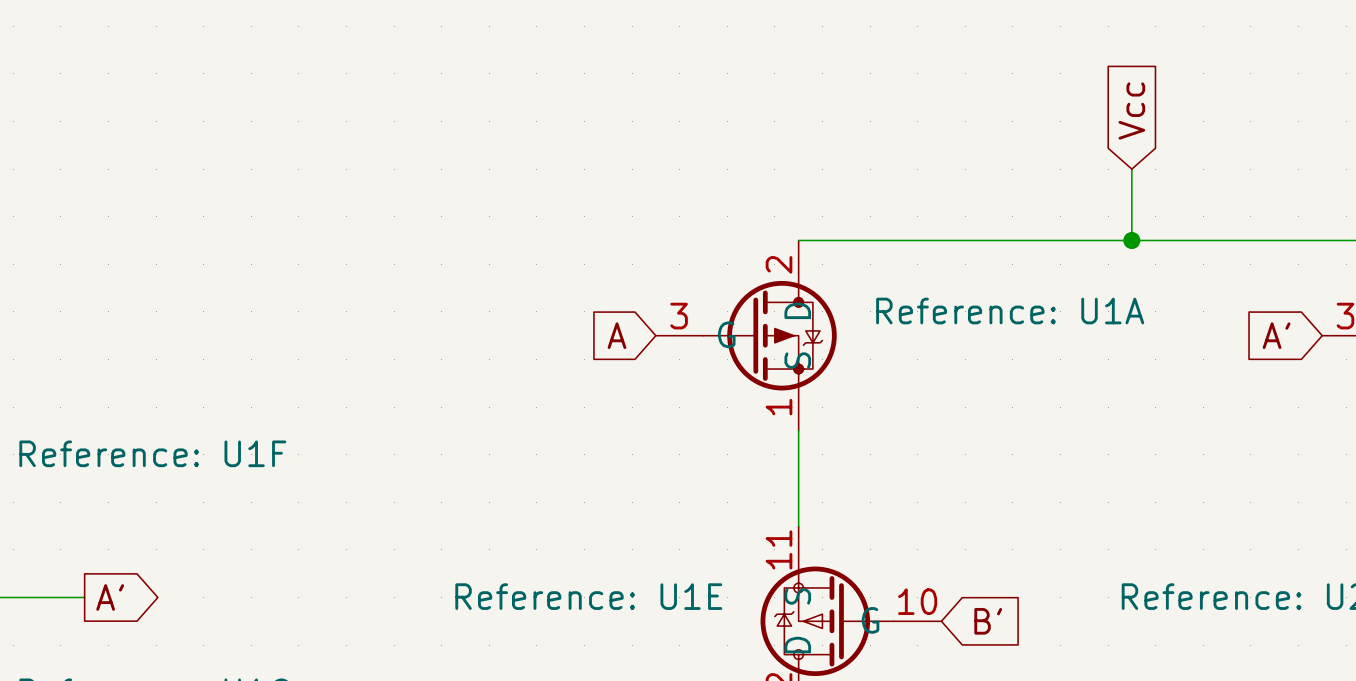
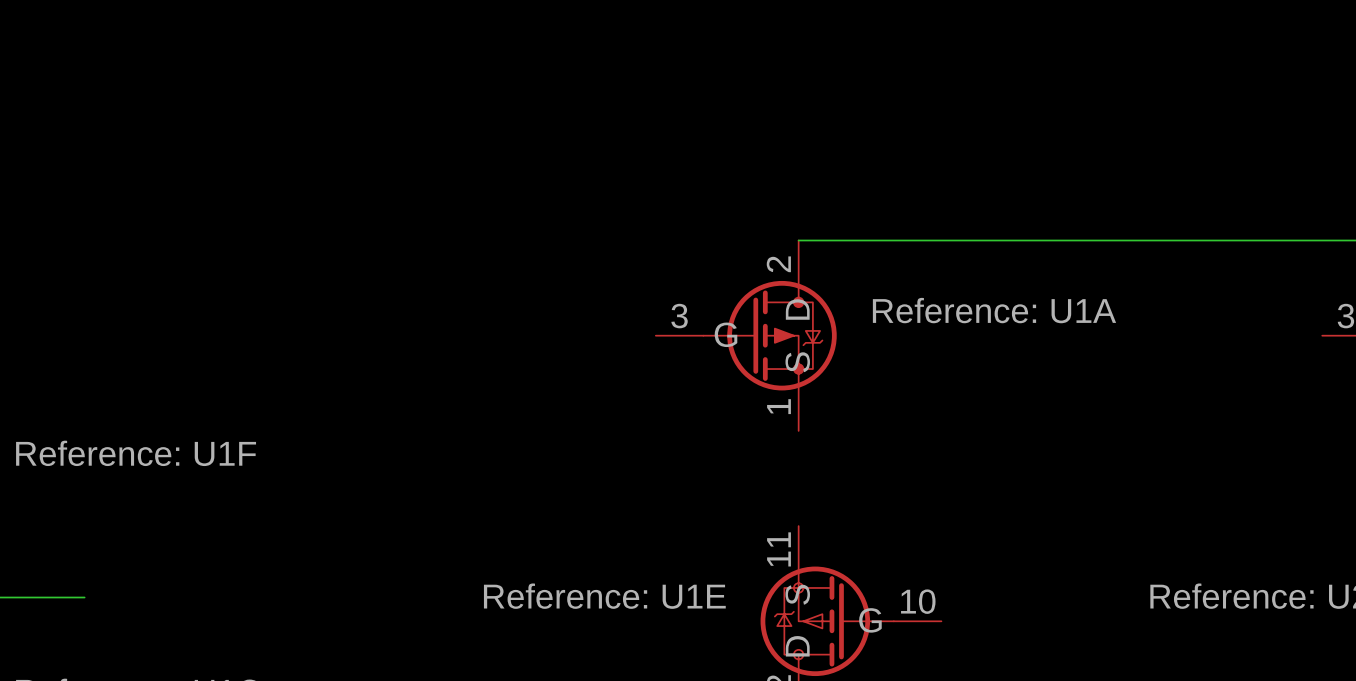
global label: Vcc (1131, 110) -> none
wire: (1131, 169) (1131, 240) -> none
junction: (1131, 240) -> none
global label: A (616, 335) -> none
global label: A' (1276, 335) -> none
wire: (798, 430) (798, 526) -> none
global label: A' (110, 597) -> none
global label: B' (988, 621) -> none

